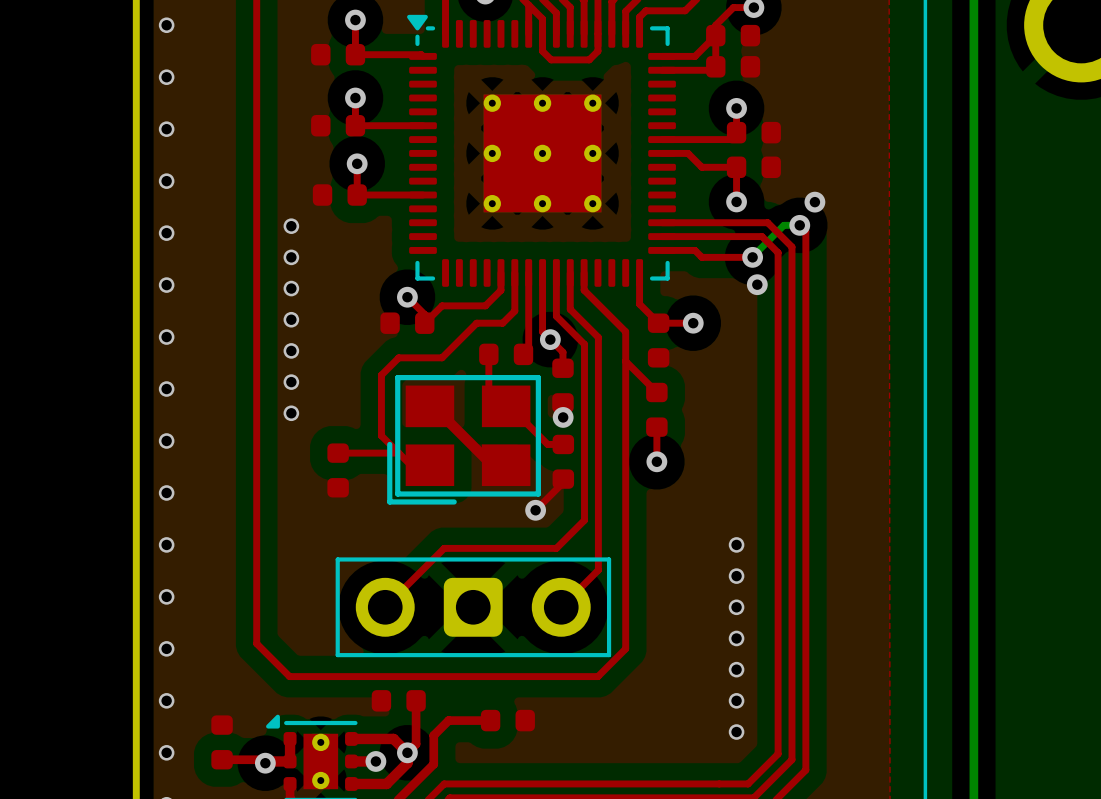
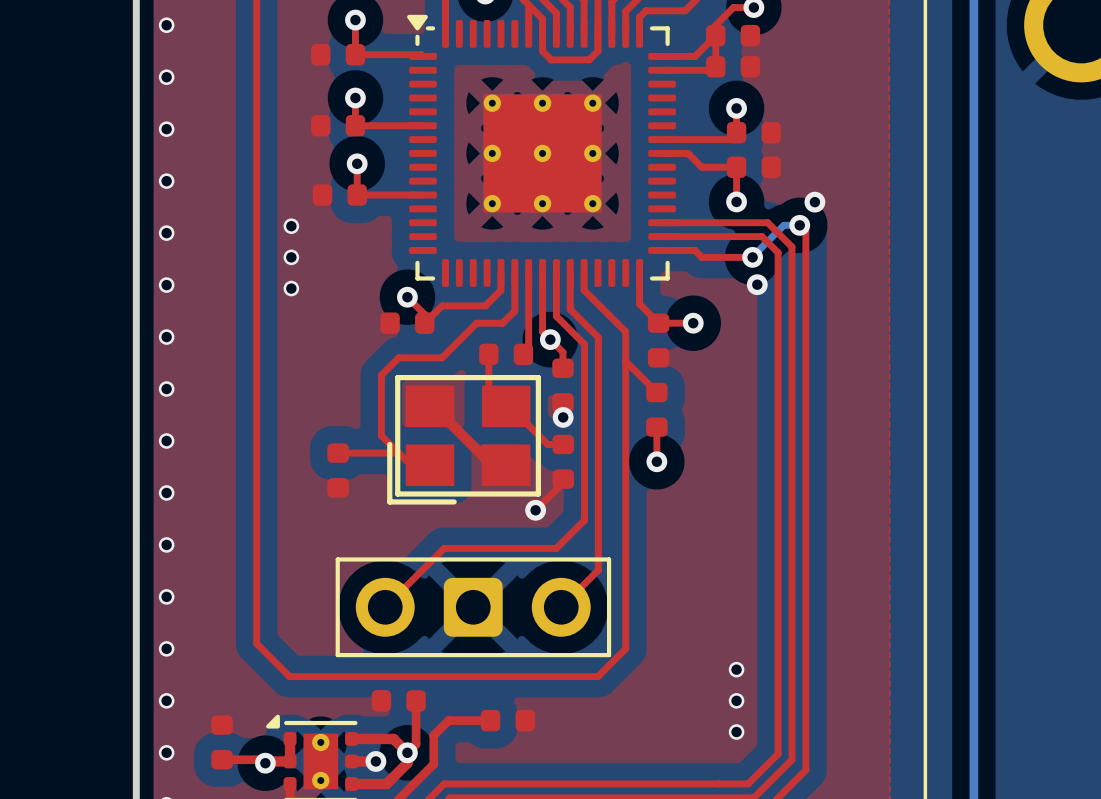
via: (291, 319) -> none
via: (291, 350) -> none
via: (291, 382) -> none
via: (291, 413) -> none
via: (736, 544) -> none
via: (736, 576) -> none
via: (736, 607) -> none
via: (736, 638) -> none

